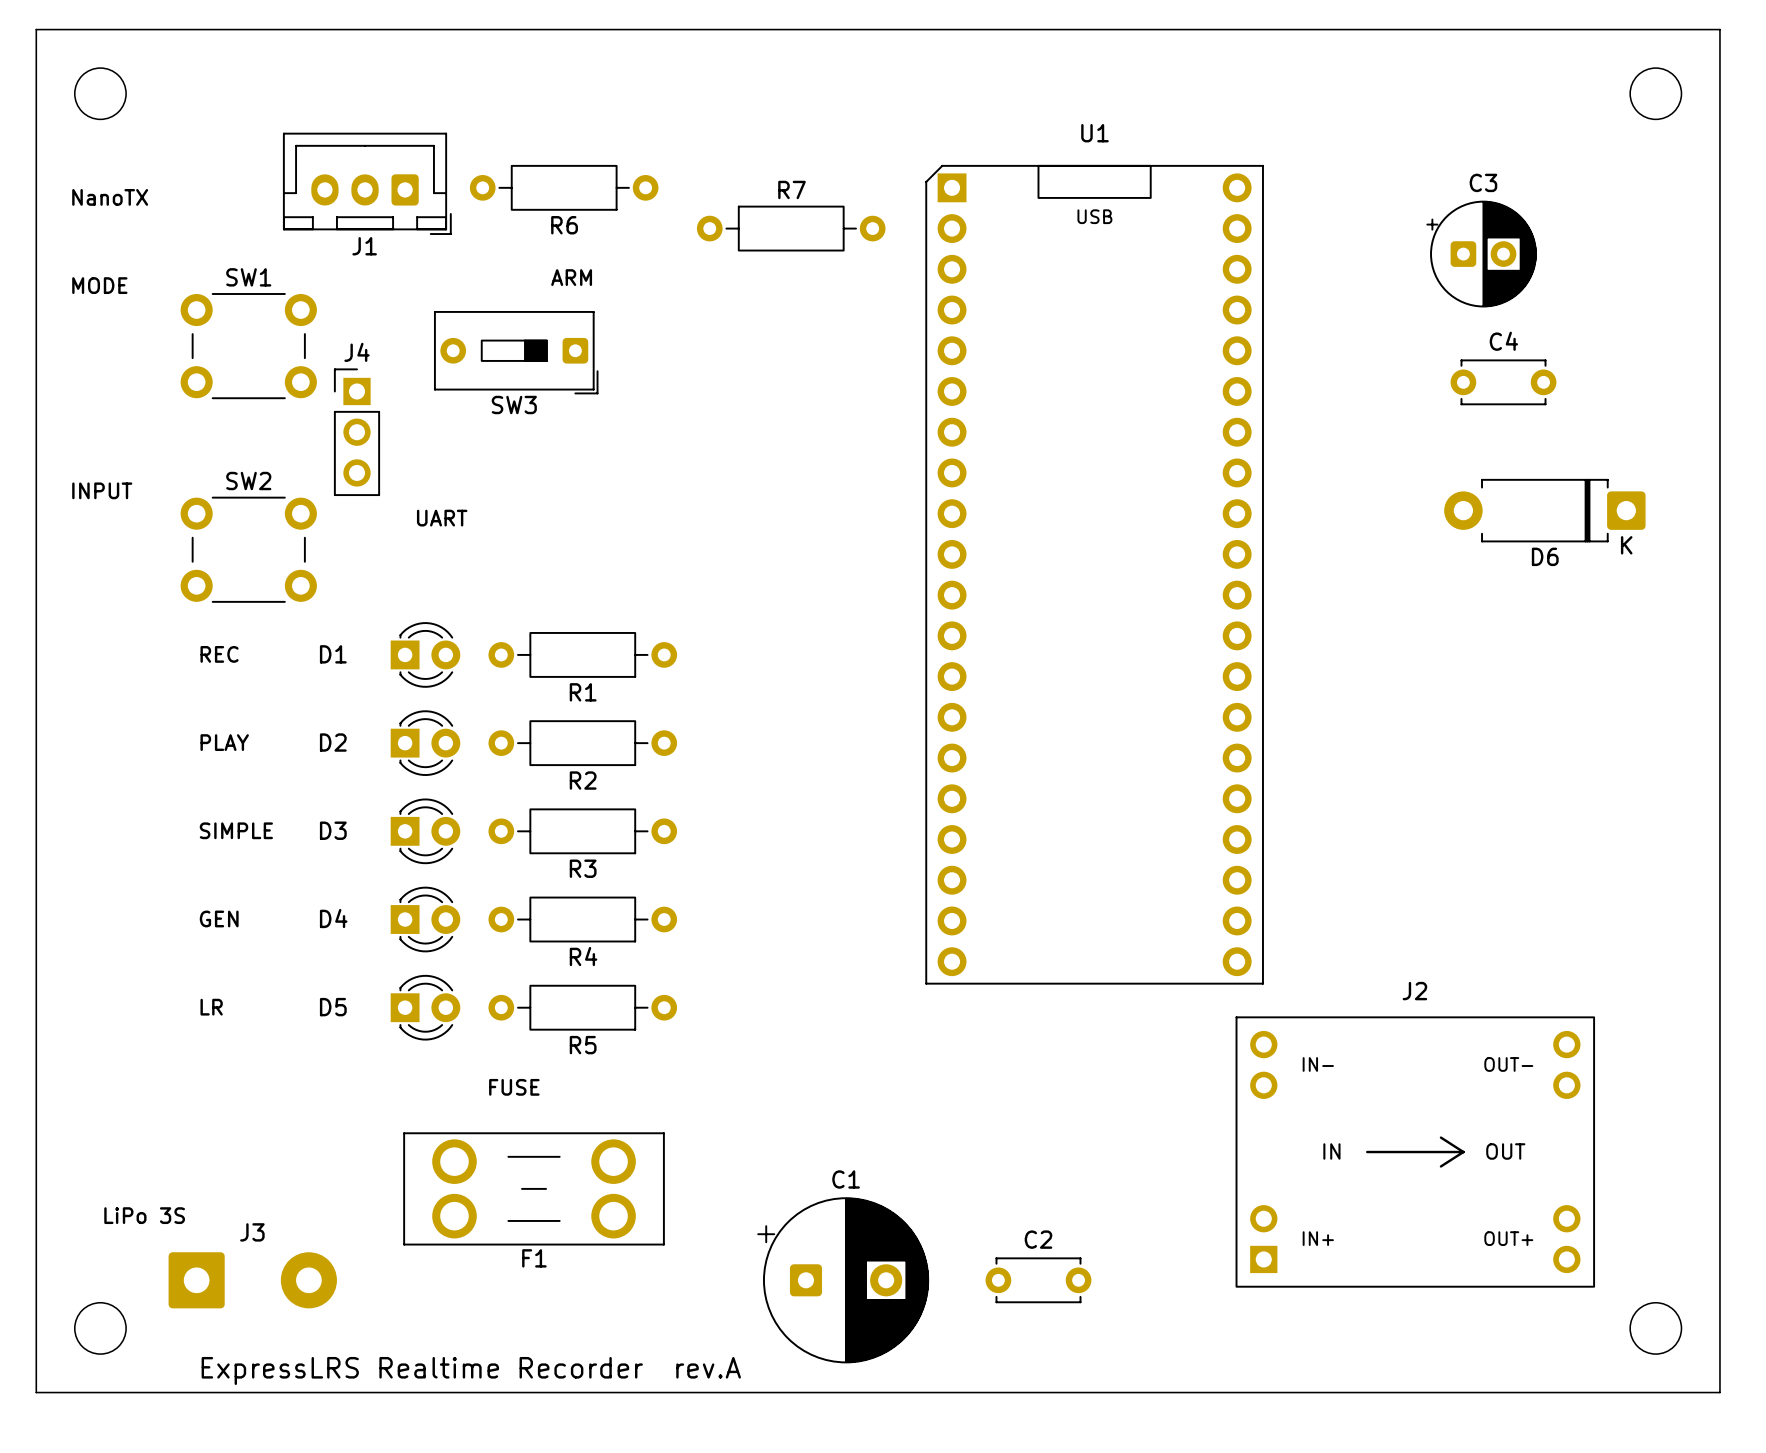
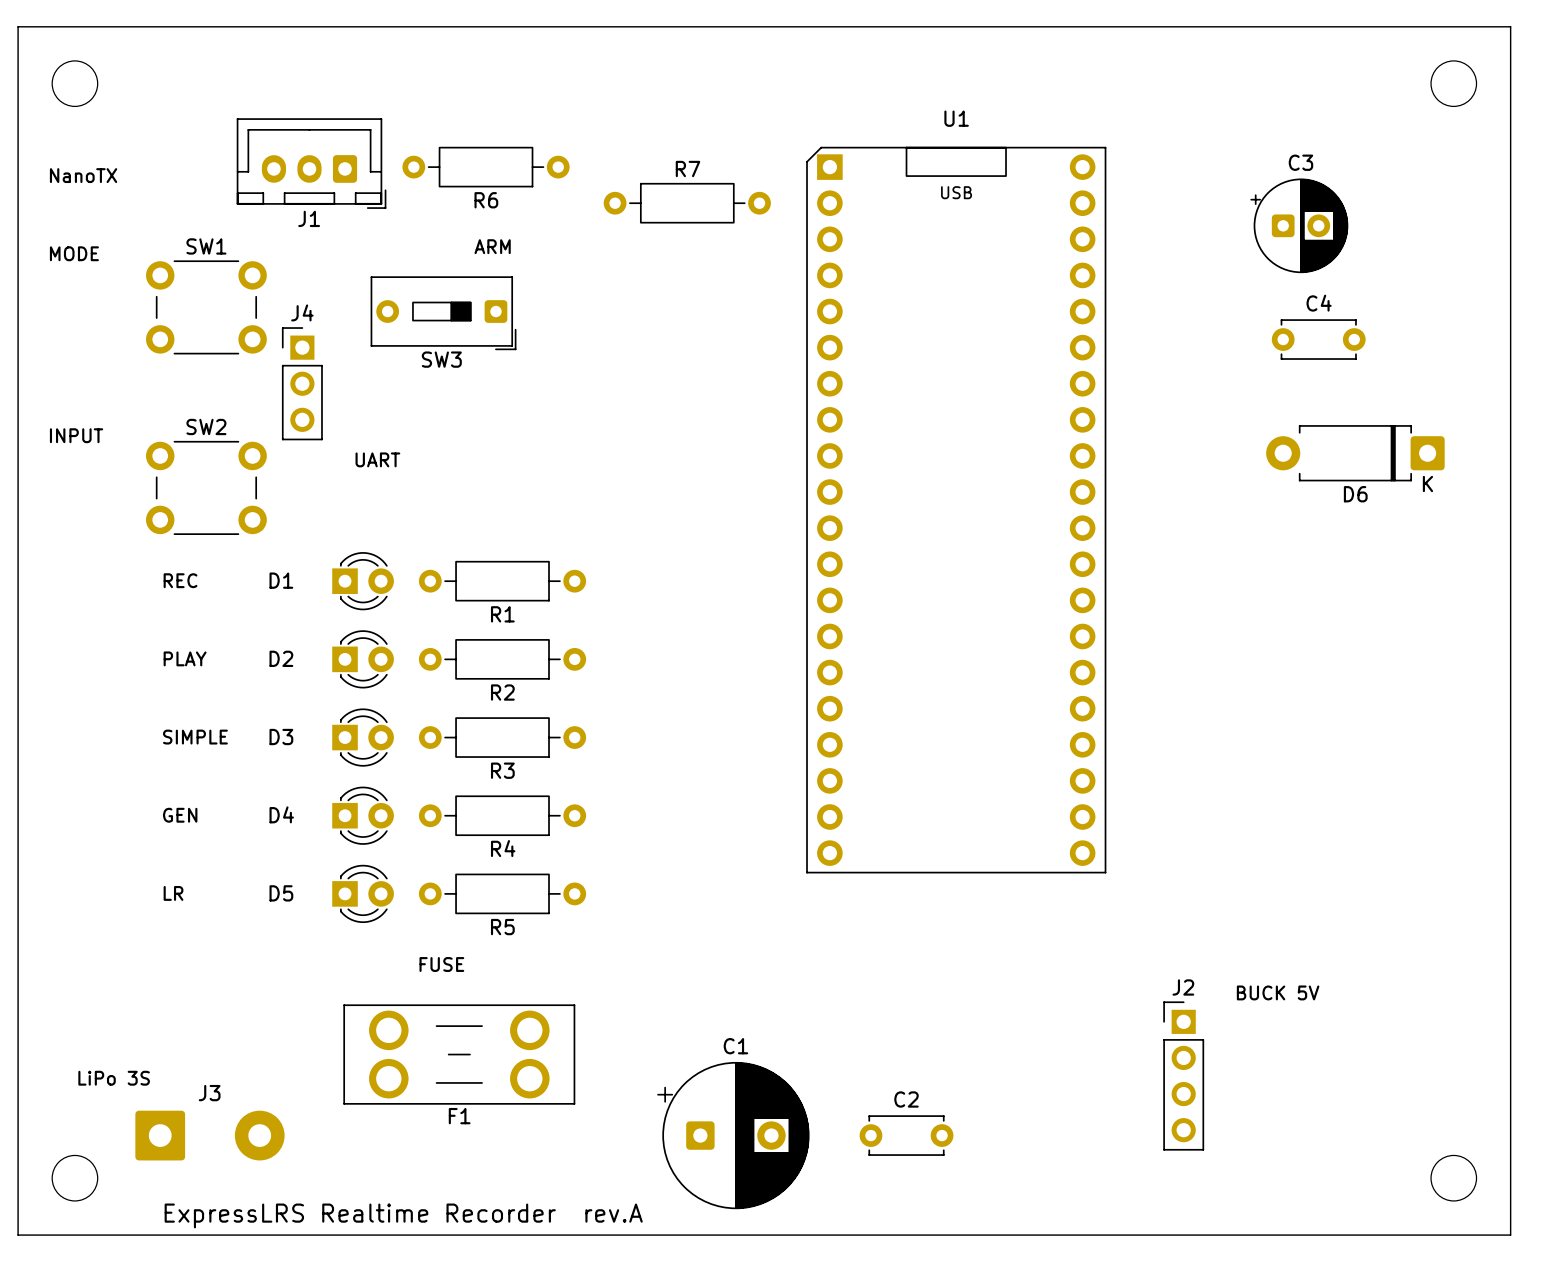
J2 name position: J2 (1414, 991) -> J2 (1183, 987)
J2 footprint: [1235, 1016, 1596, 1288] -> [1163, 1001, 1205, 1151]
text: none -> BUCK 5V (1278, 992)

